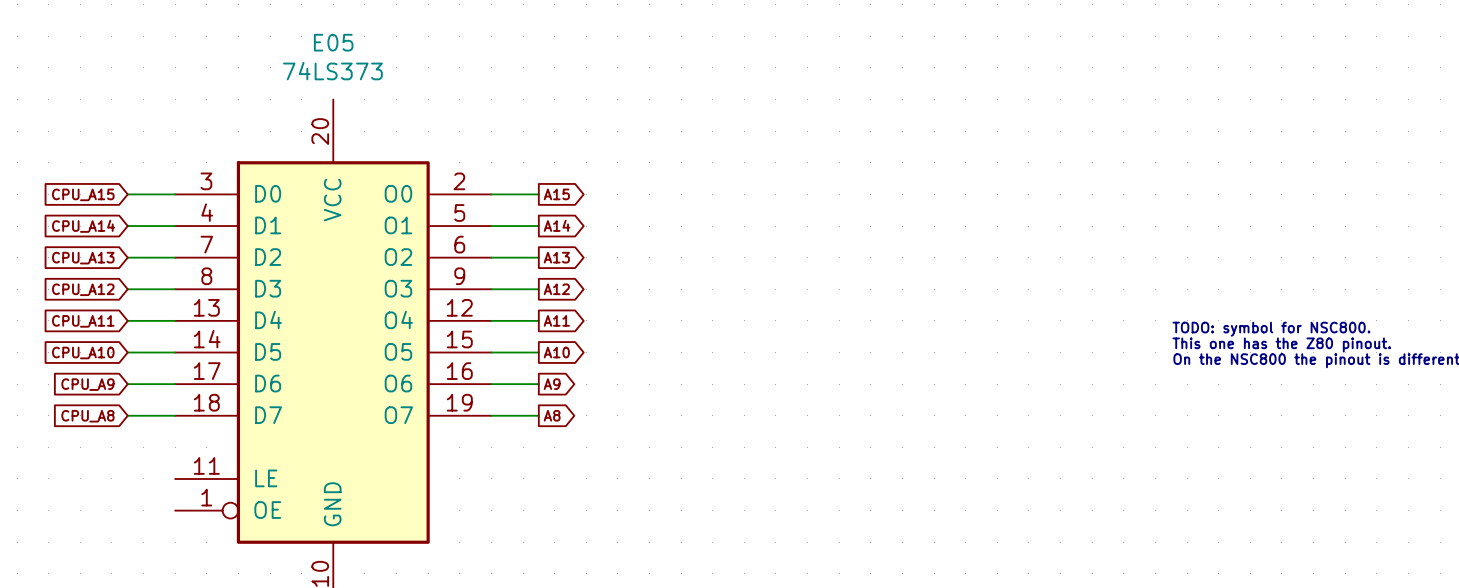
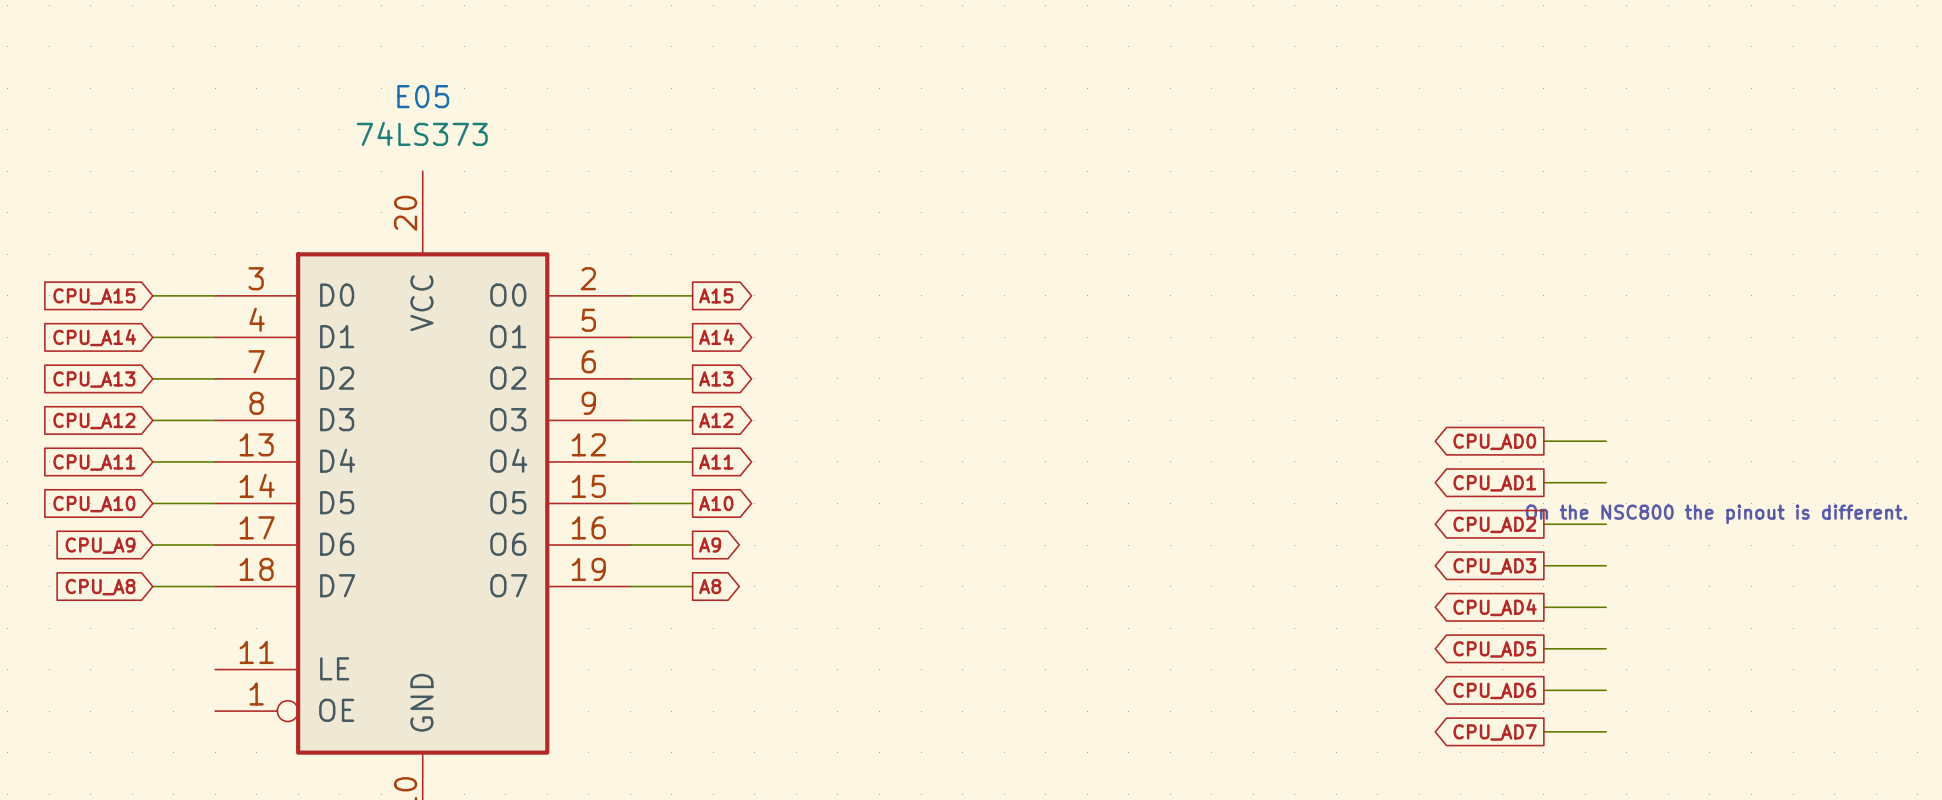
global label: none -> CPU_AD0 (1494, 441)
wire: none -> (1543, 441) (1606, 441)
text: TODO: symbol for NSC800. (1271, 329) -> none
wire: none -> (1543, 482) (1606, 482)
global label: none -> CPU_AD1 (1494, 483)
text: This one has the Z80 pinout. (1281, 344) -> none
global label: none -> CPU_AD2 (1494, 524)
wire: none -> (1543, 524) (1606, 524)
wire: none -> (1543, 565) (1606, 565)
global label: none -> CPU_AD3 (1494, 566)
global label: none -> CPU_AD4 (1495, 607)
wire: none -> (1543, 607) (1606, 607)
global label: none -> CPU_AD5 (1494, 649)
wire: none -> (1543, 648) (1606, 648)
wire: none -> (1543, 690) (1606, 690)
global label: none -> CPU_AD6 (1494, 690)
global label: none -> CPU_AD7 (1495, 732)
wire: none -> (1543, 731) (1606, 731)

